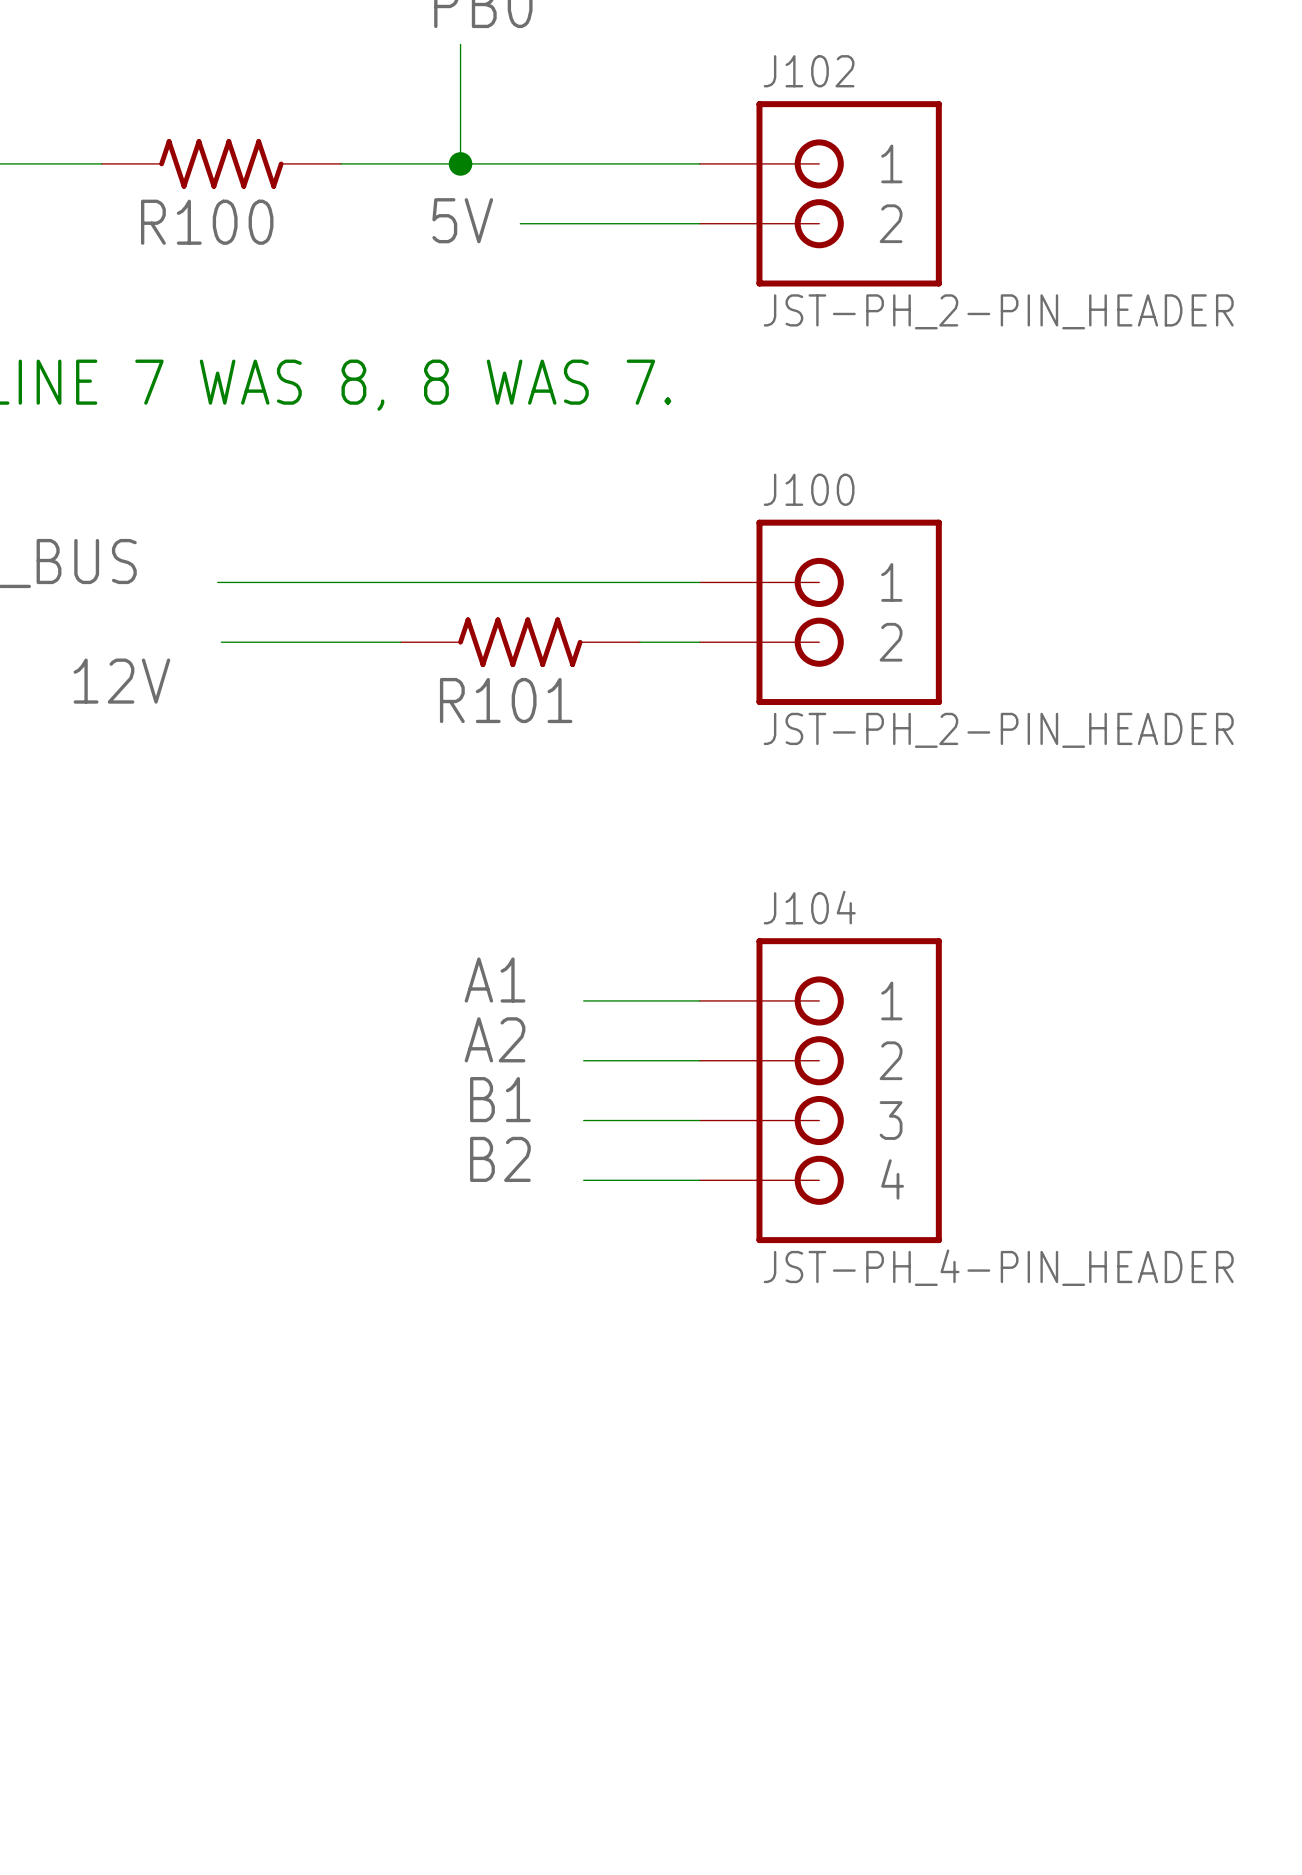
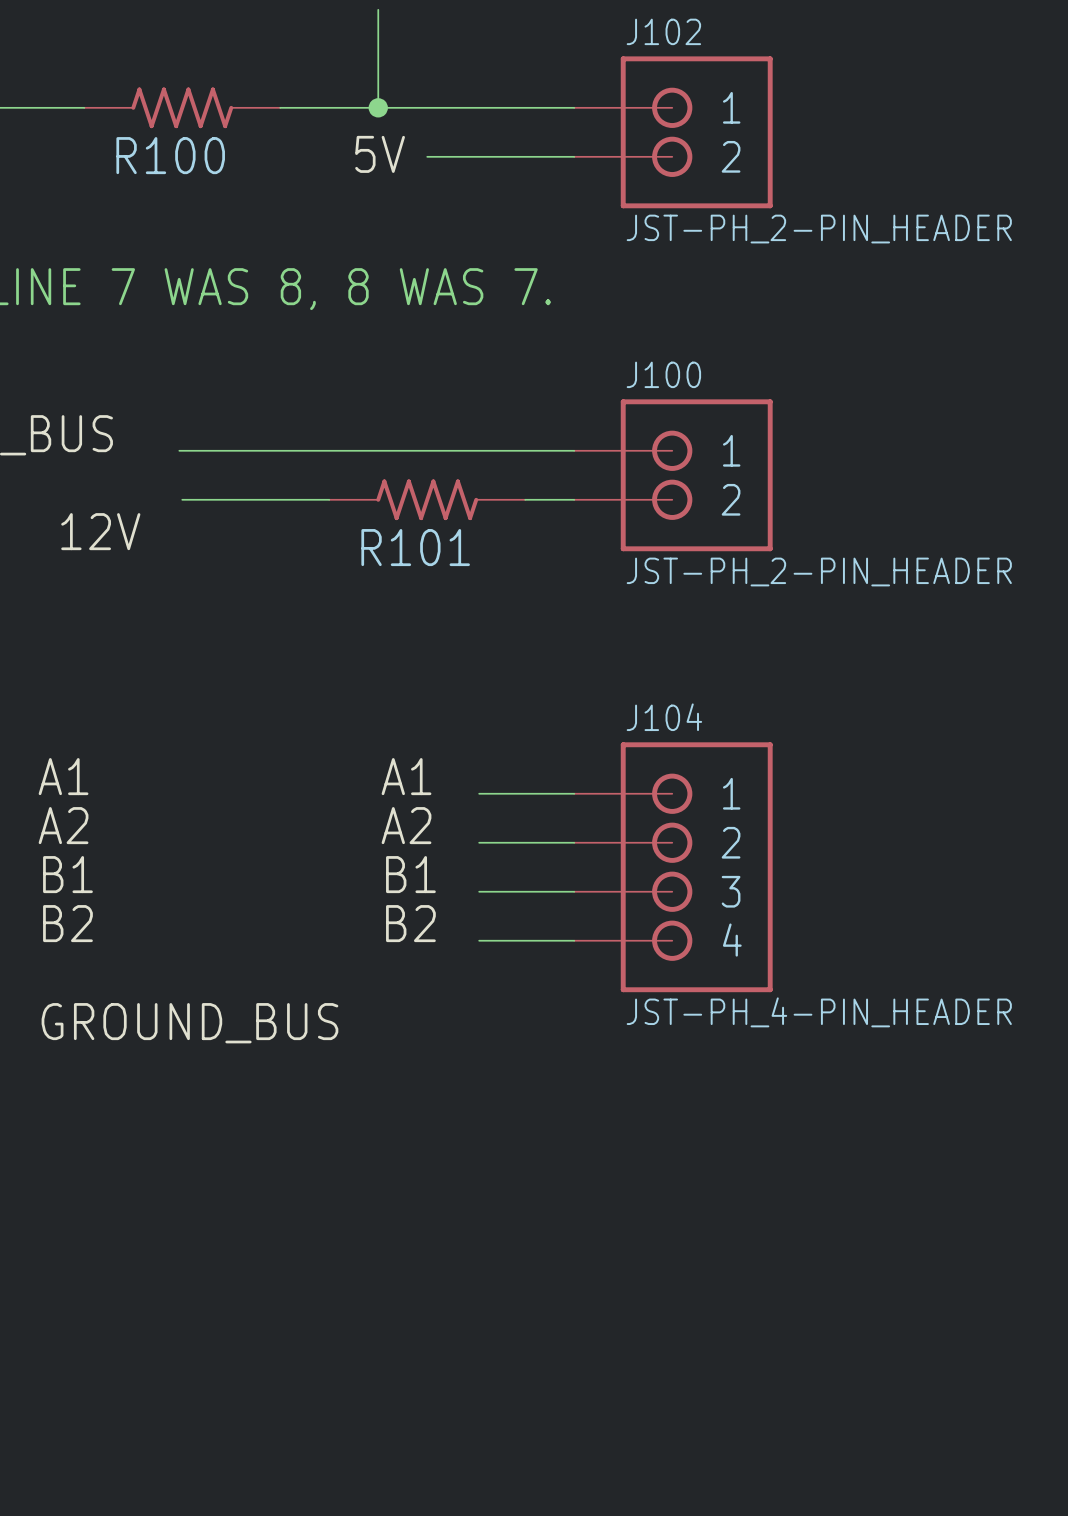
label: none -> A1 (63, 776)
label: none -> A2 (63, 825)
label: none -> B1 (67, 874)
label: none -> B2 (67, 923)
label: none -> GROUND_BUS (189, 1023)

